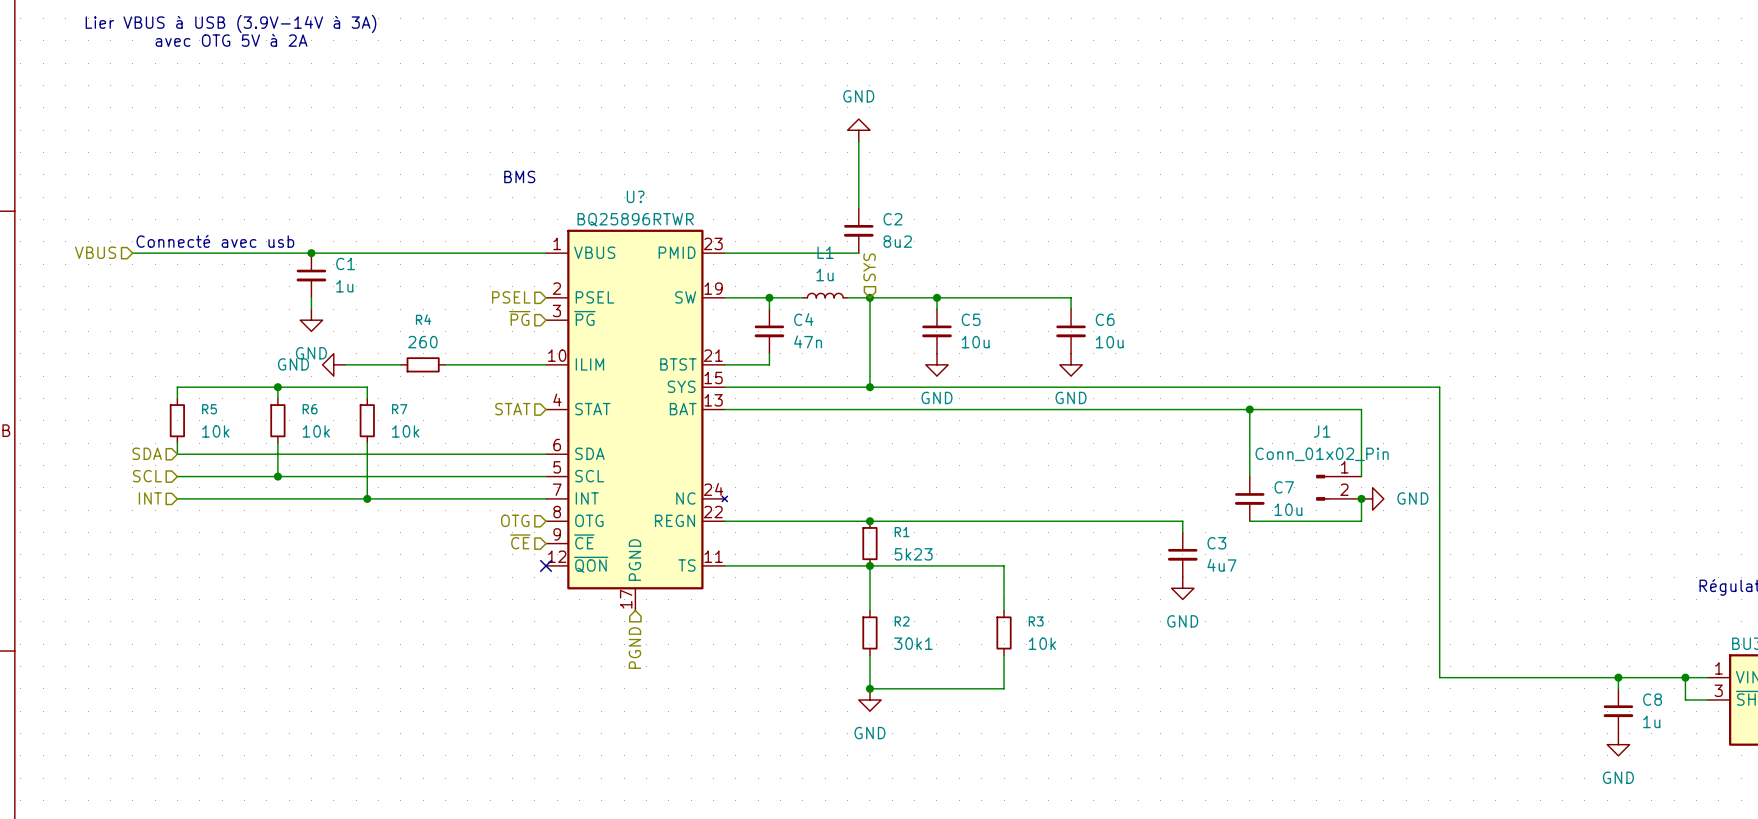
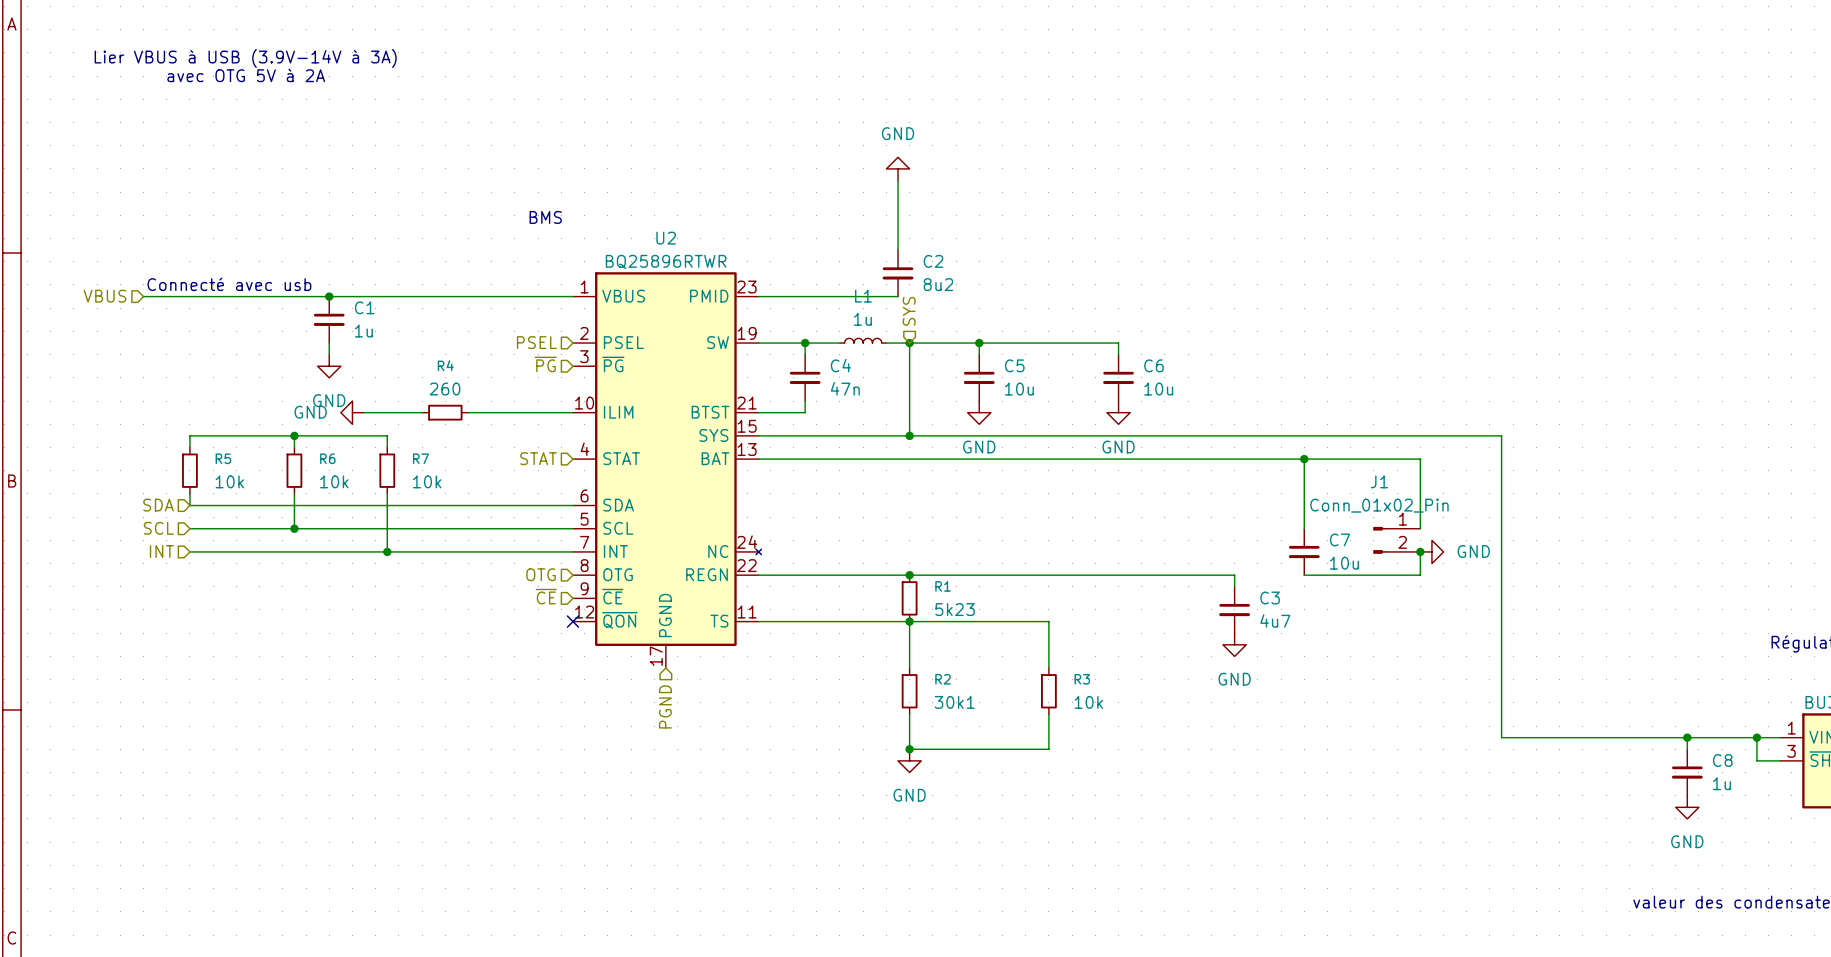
U? name: U? (635, 196) -> U2 (666, 238)

